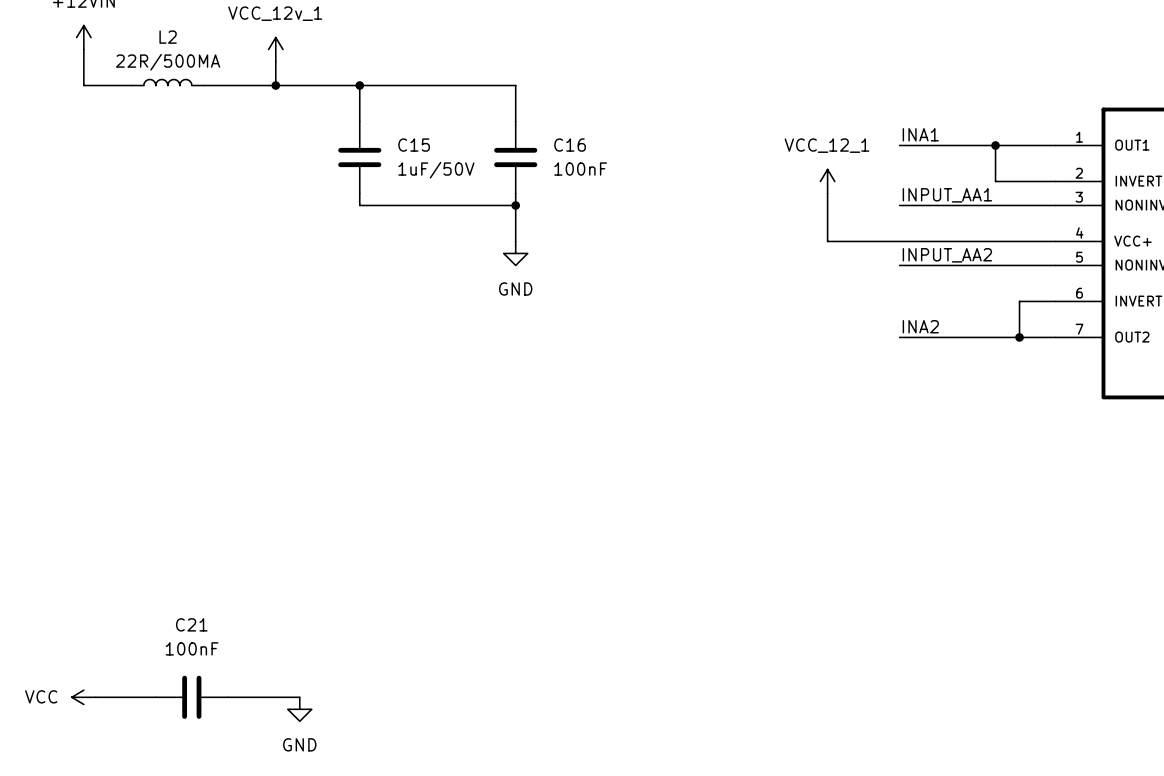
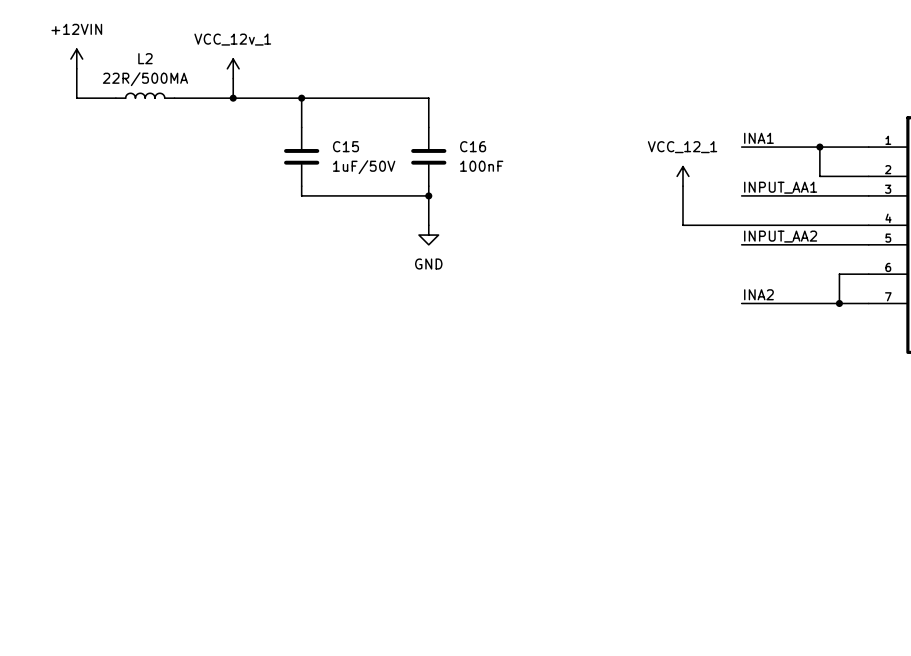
power symbol: VCC (83, 697) -> none
wire: (95, 697) (155, 697) -> none
C21: 100nF (191, 697) -> none
wire: (227, 697) (299, 697) -> none
power symbol: GND (299, 709) -> none

